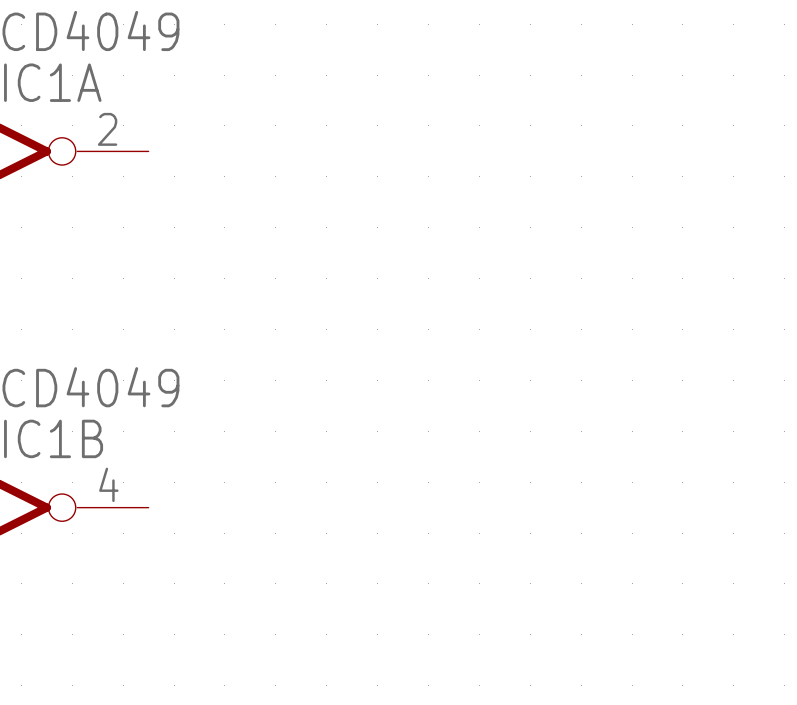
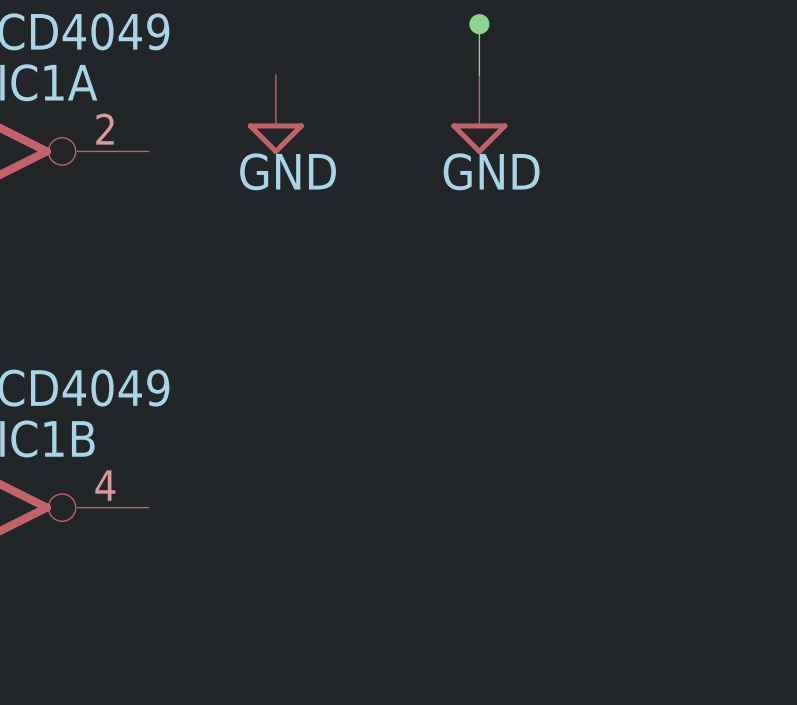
wire: none -> (479, 24) (479, 75)
junction: none -> (479, 24)
power symbol: none -> GND (275, 114)
power symbol: none -> GND (479, 114)

